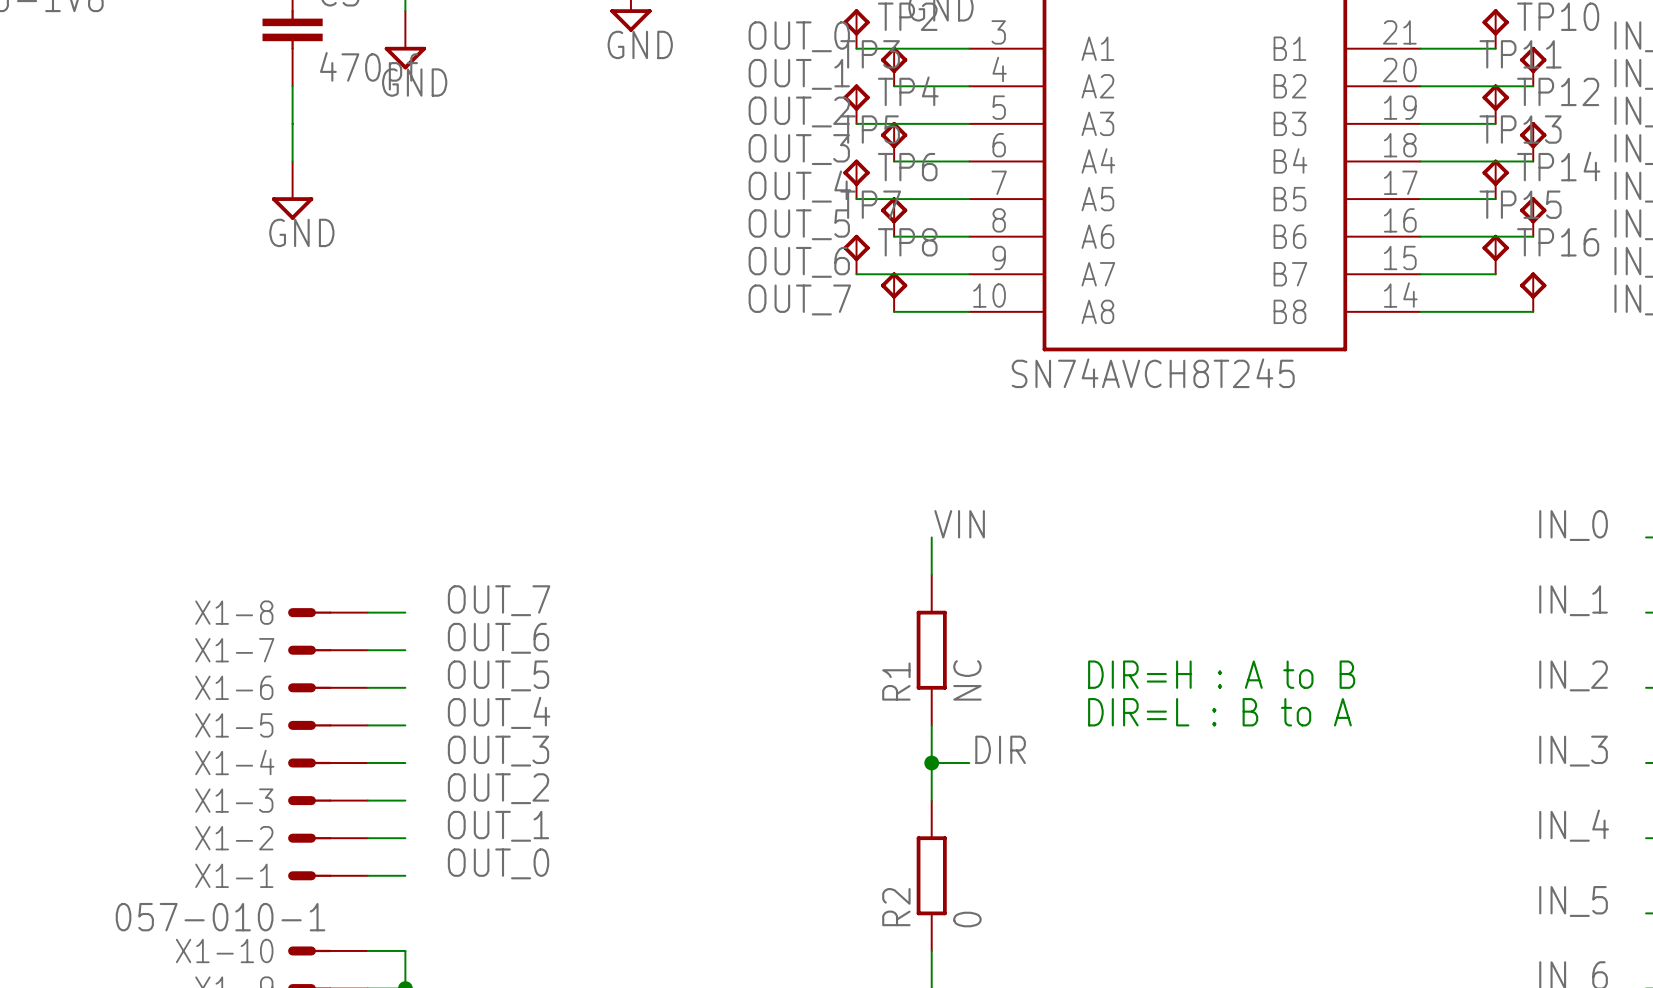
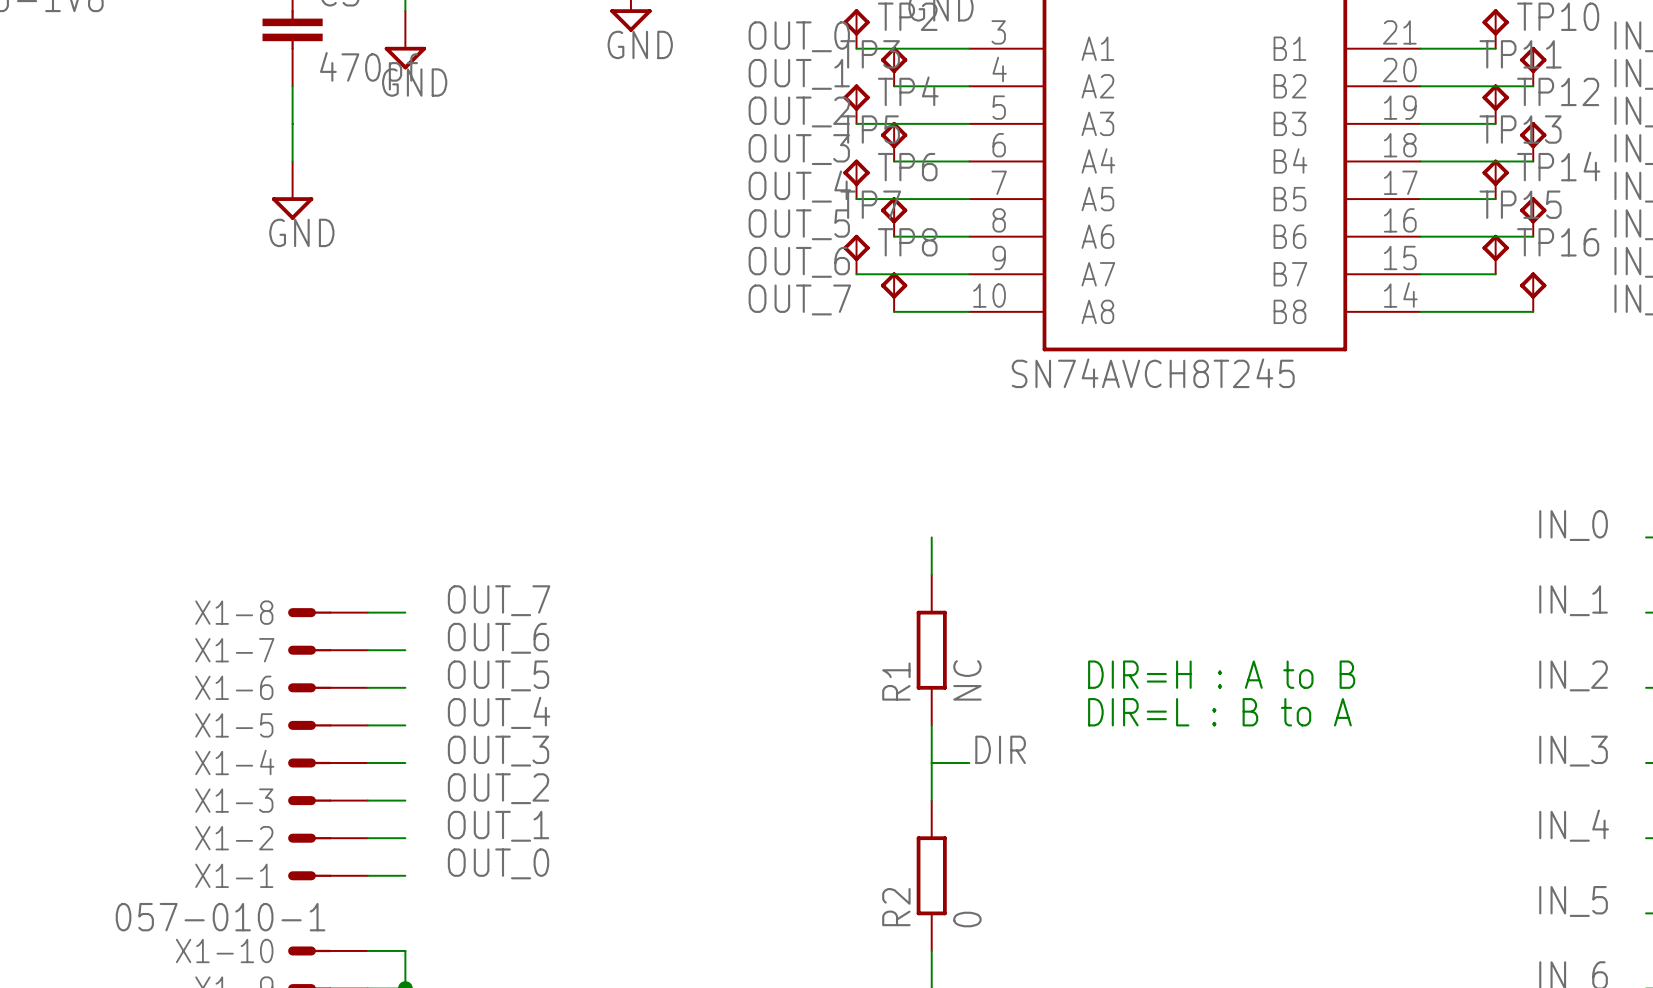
label: VIN (959, 524) -> none
junction: (931, 763) -> none

